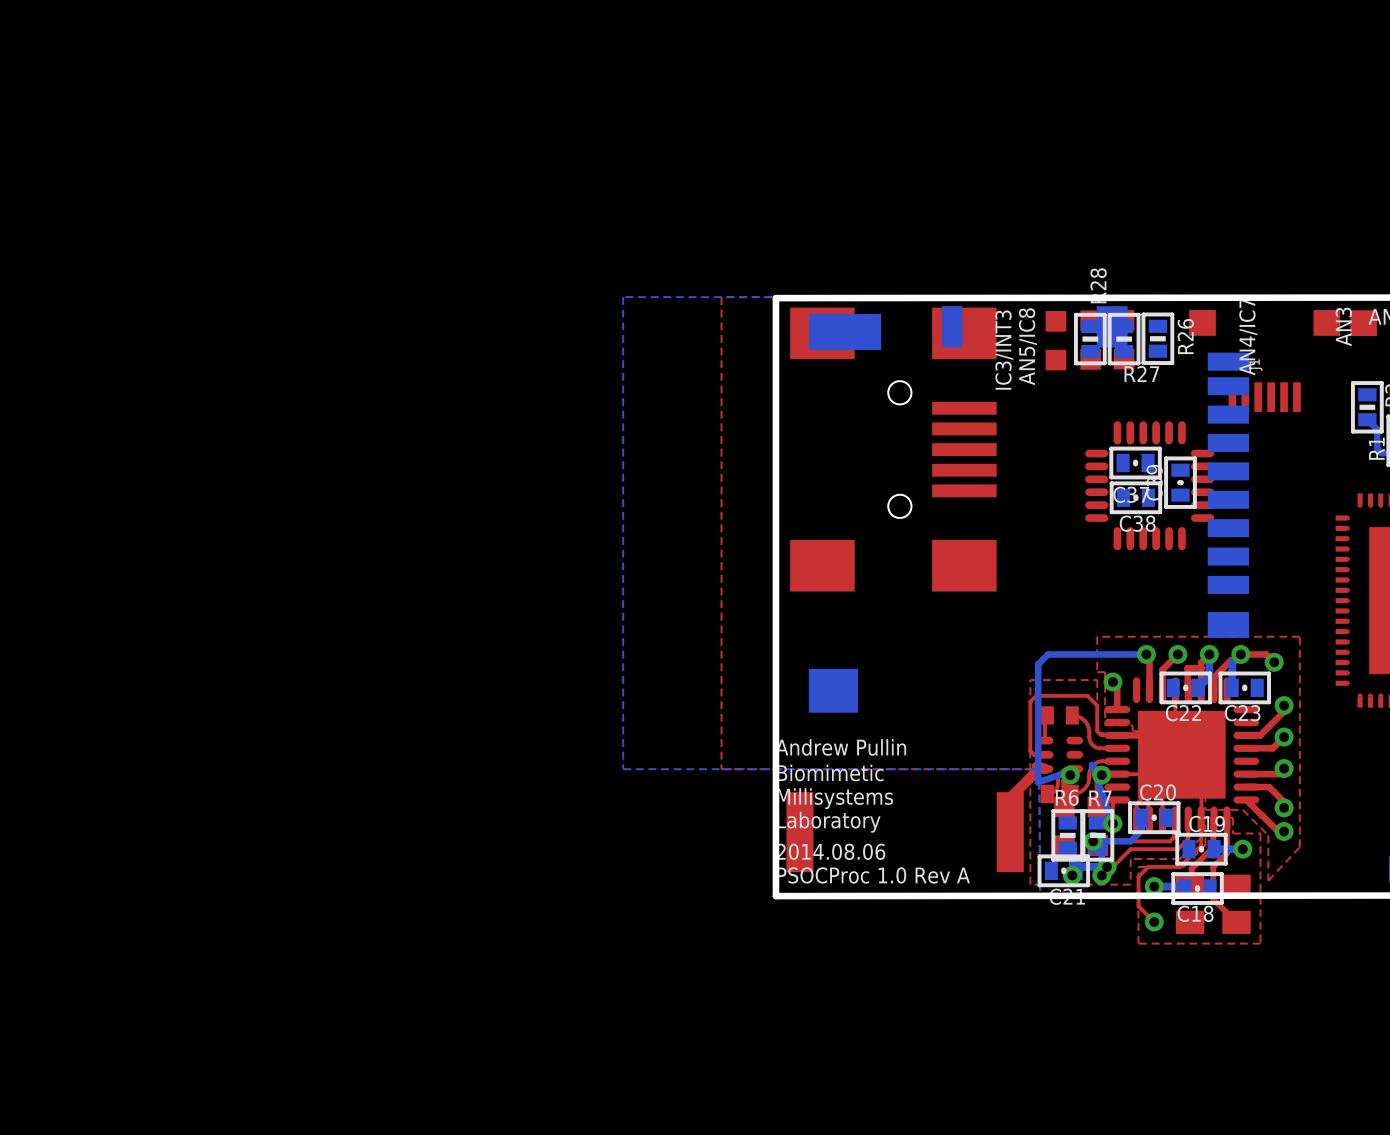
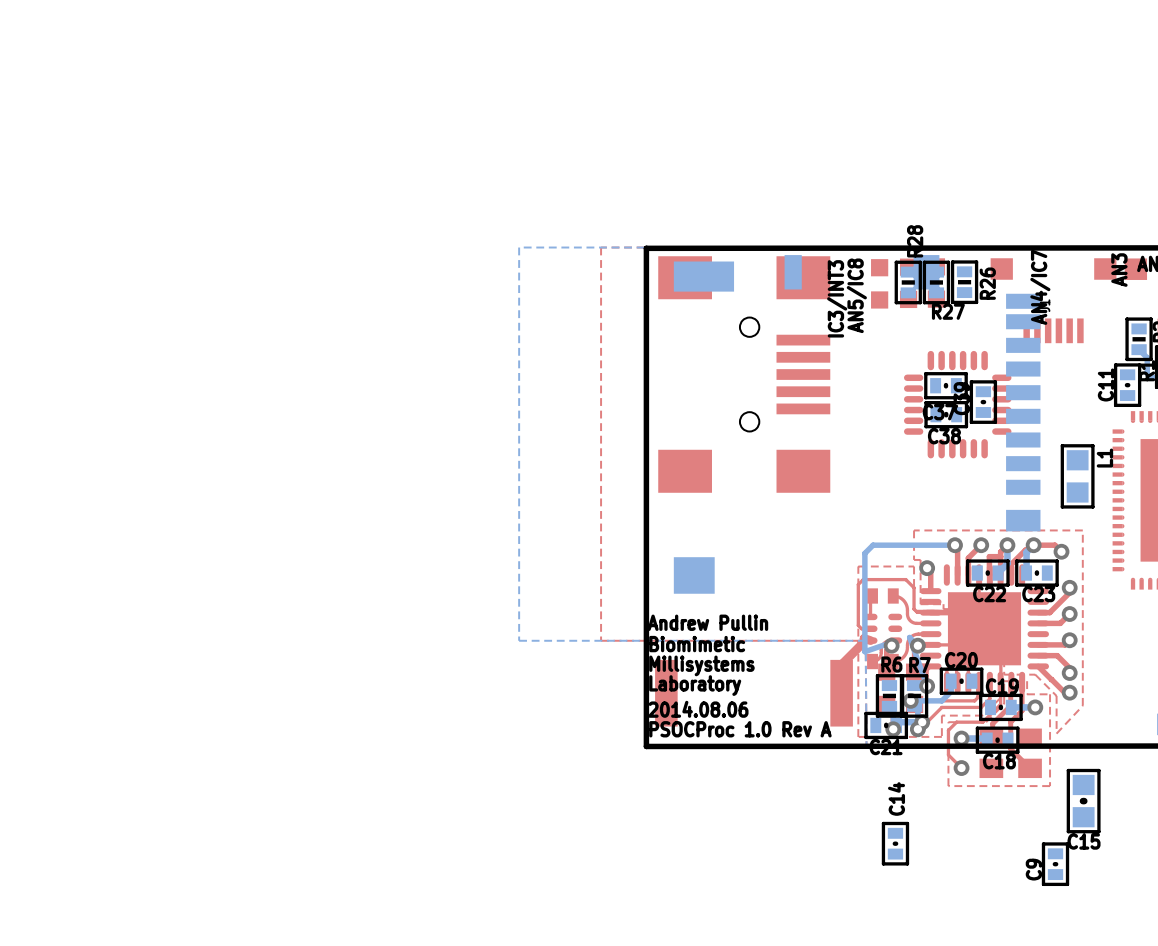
C11: none -> (1127, 385)
L1: none -> (1077, 476)
C15: none -> (1083, 801)
C14: none -> (895, 843)
C9: none -> (1055, 864)

